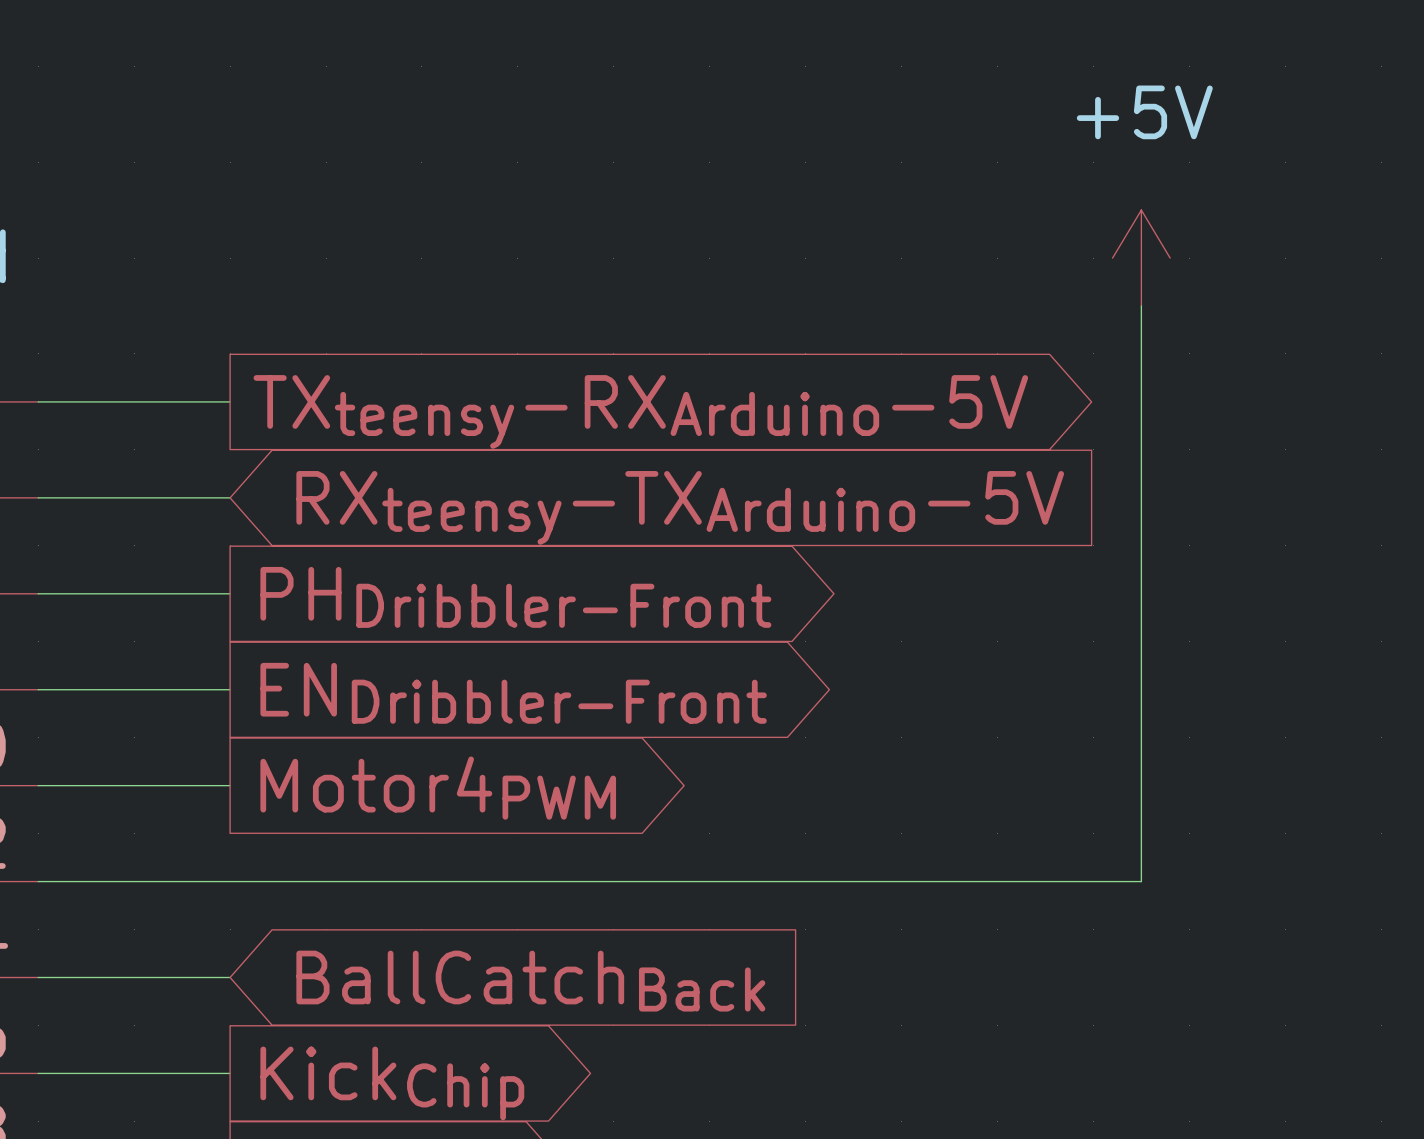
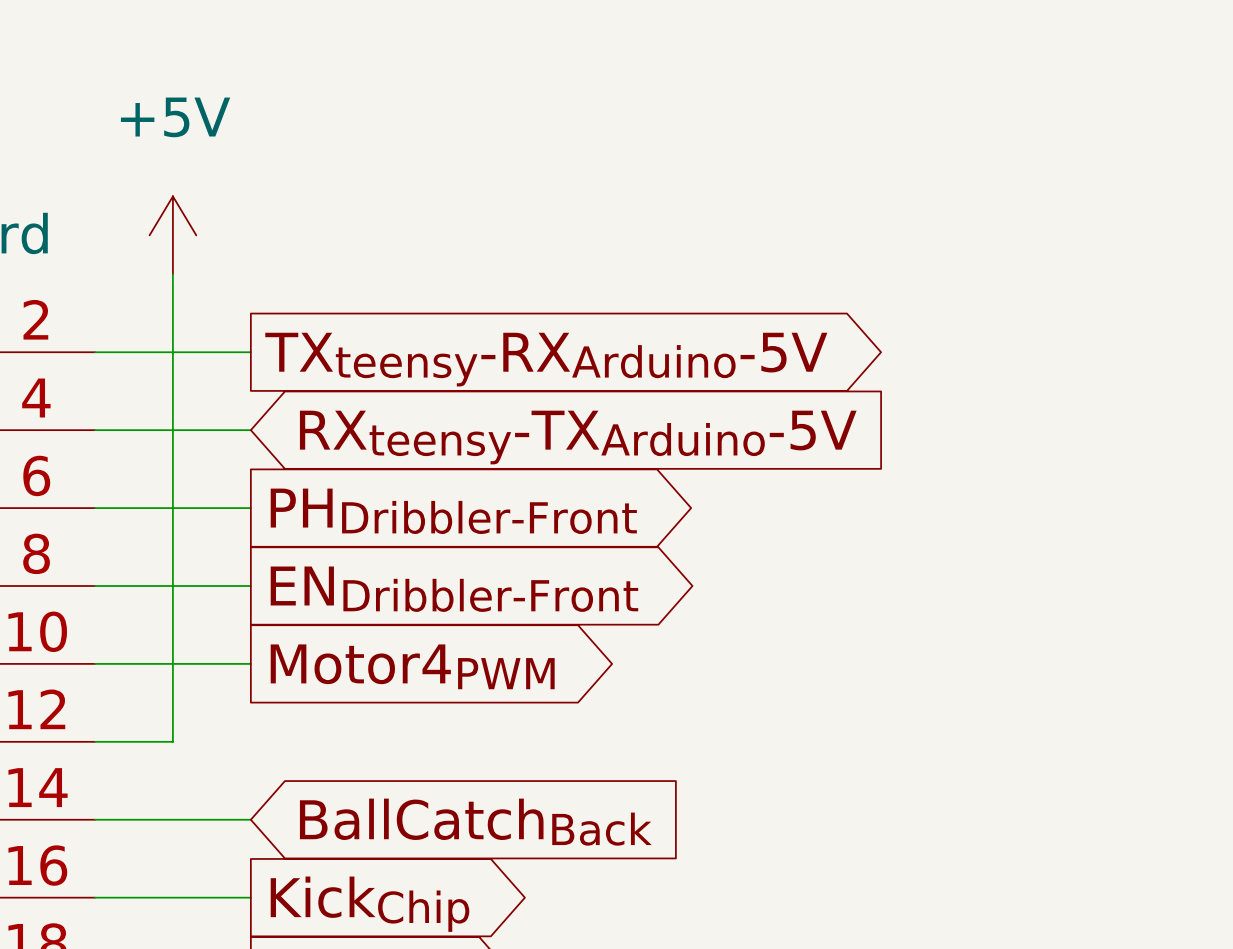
power symbol: none -> +5V (172, 235)
power symbol: +5V (1141, 258) -> none
wire: (1141, 306) (1141, 881) (134, 881) -> (172, 274) (172, 741)

